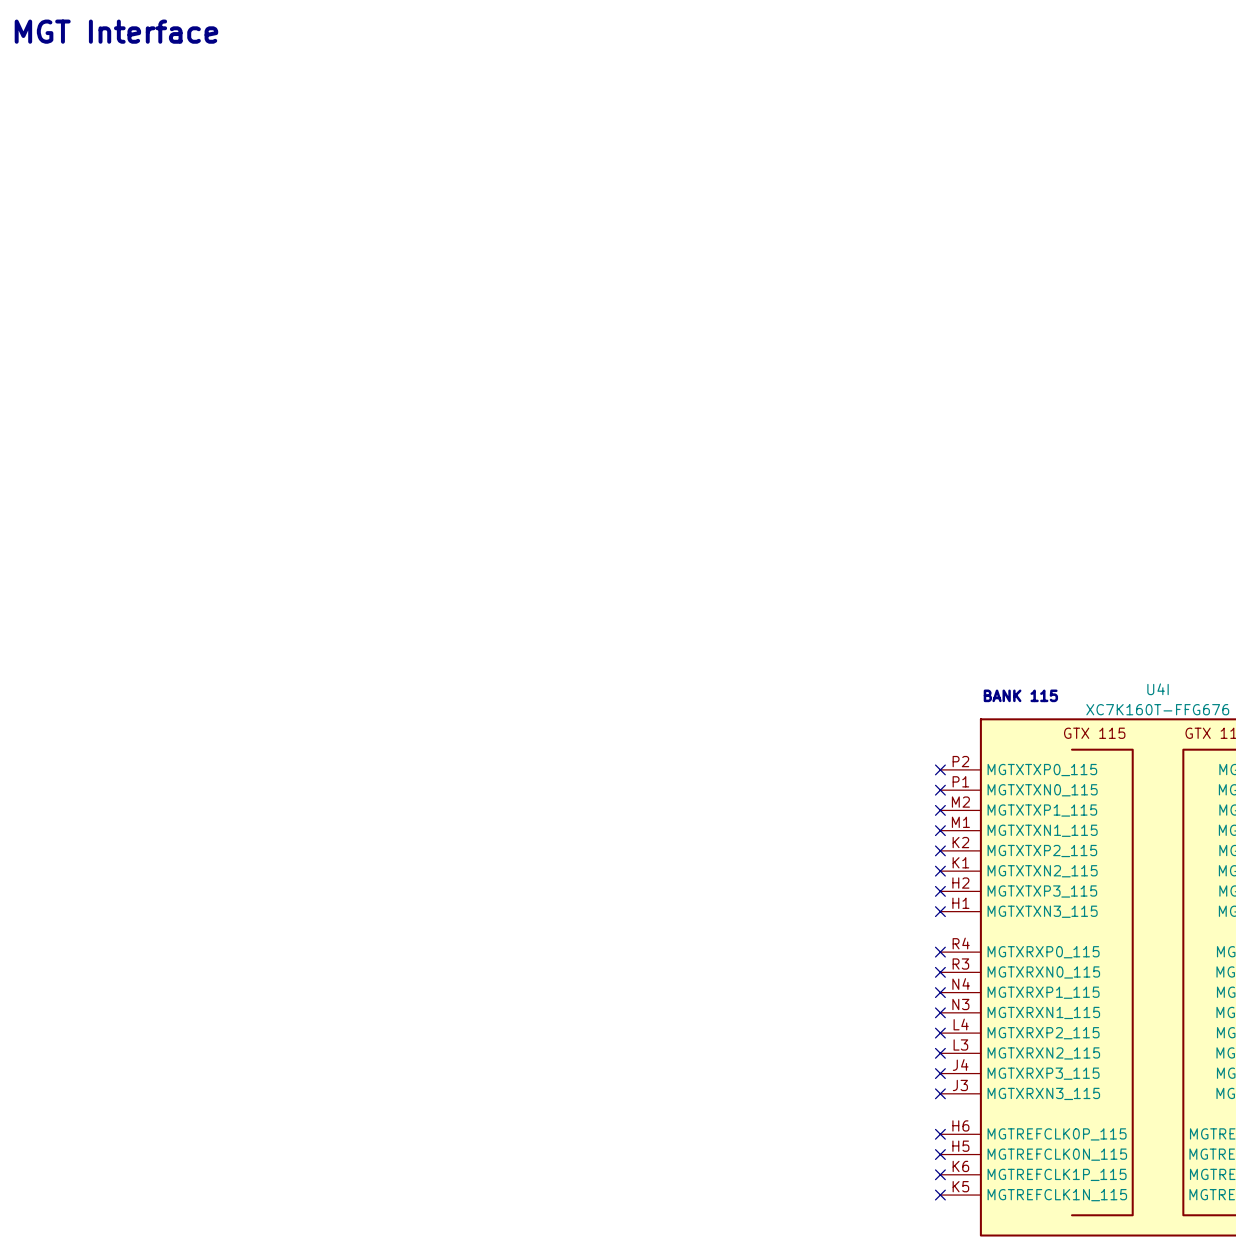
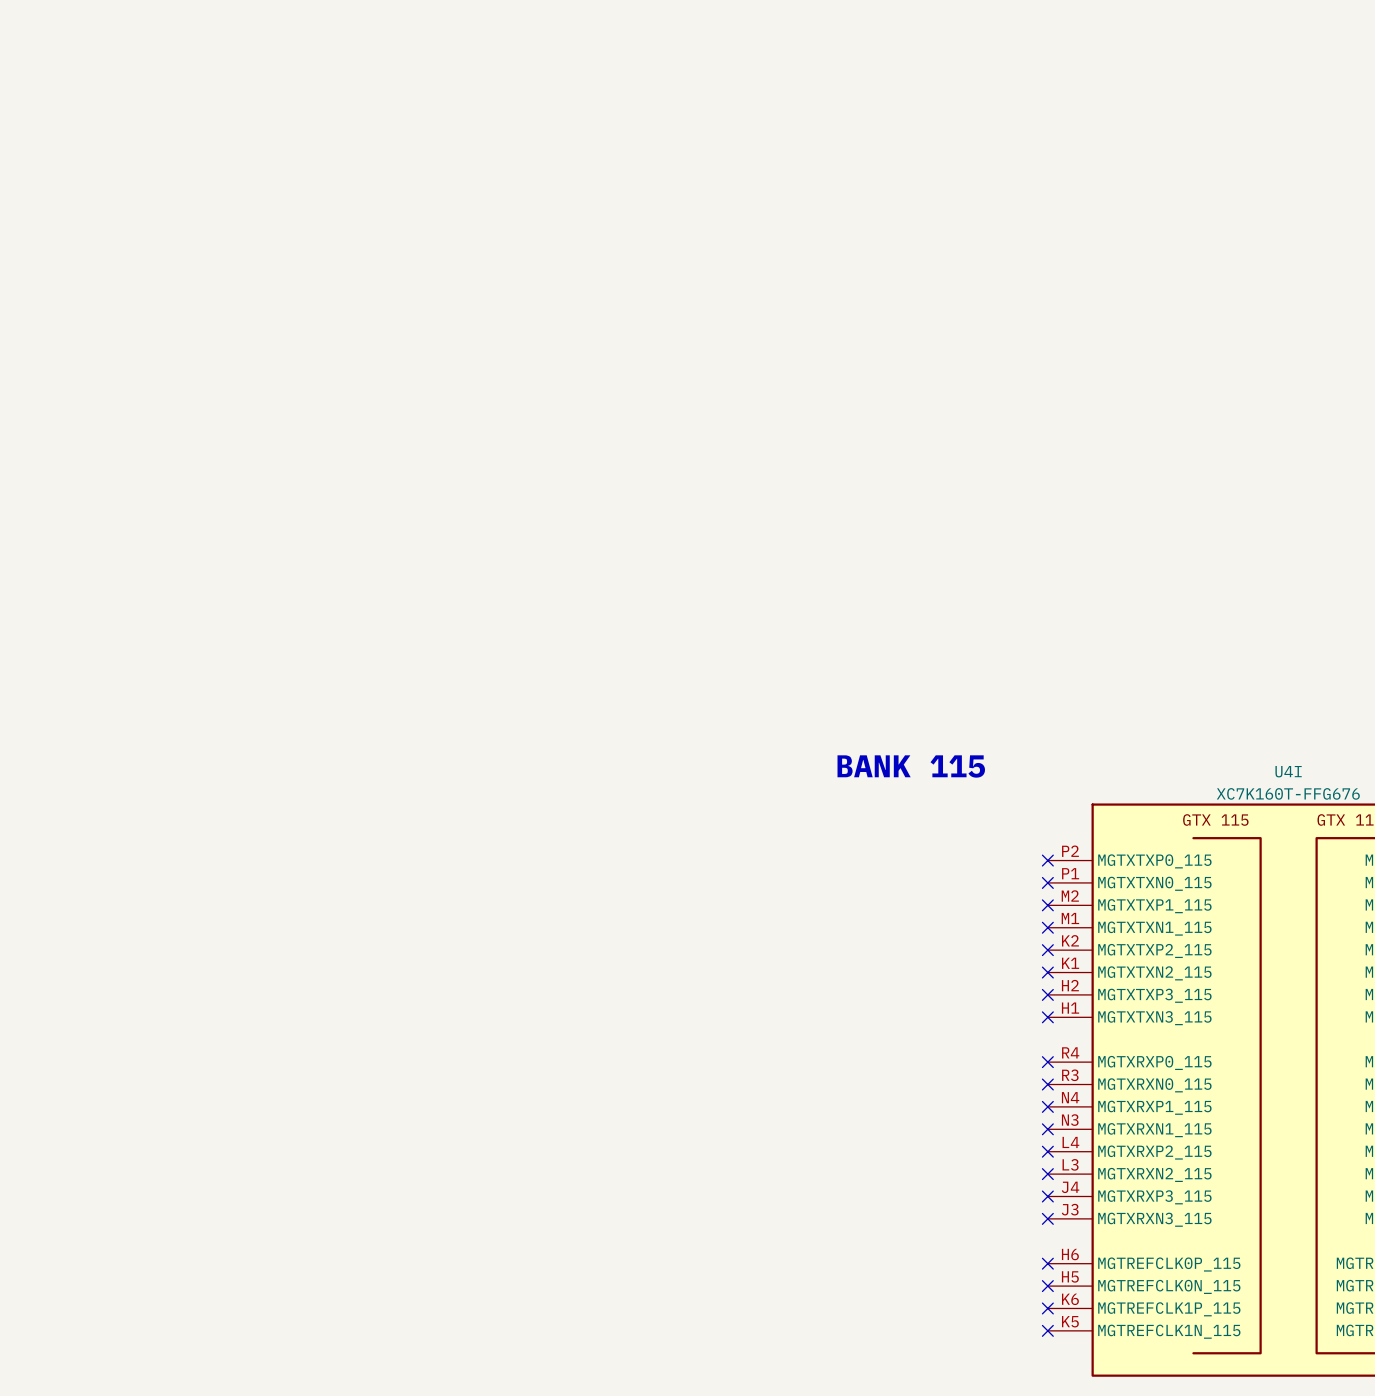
text: MGT Interface (116, 31) -> none
text: none -> BANK 115 (911, 766)
text: BANK 115 (1020, 695) -> none

